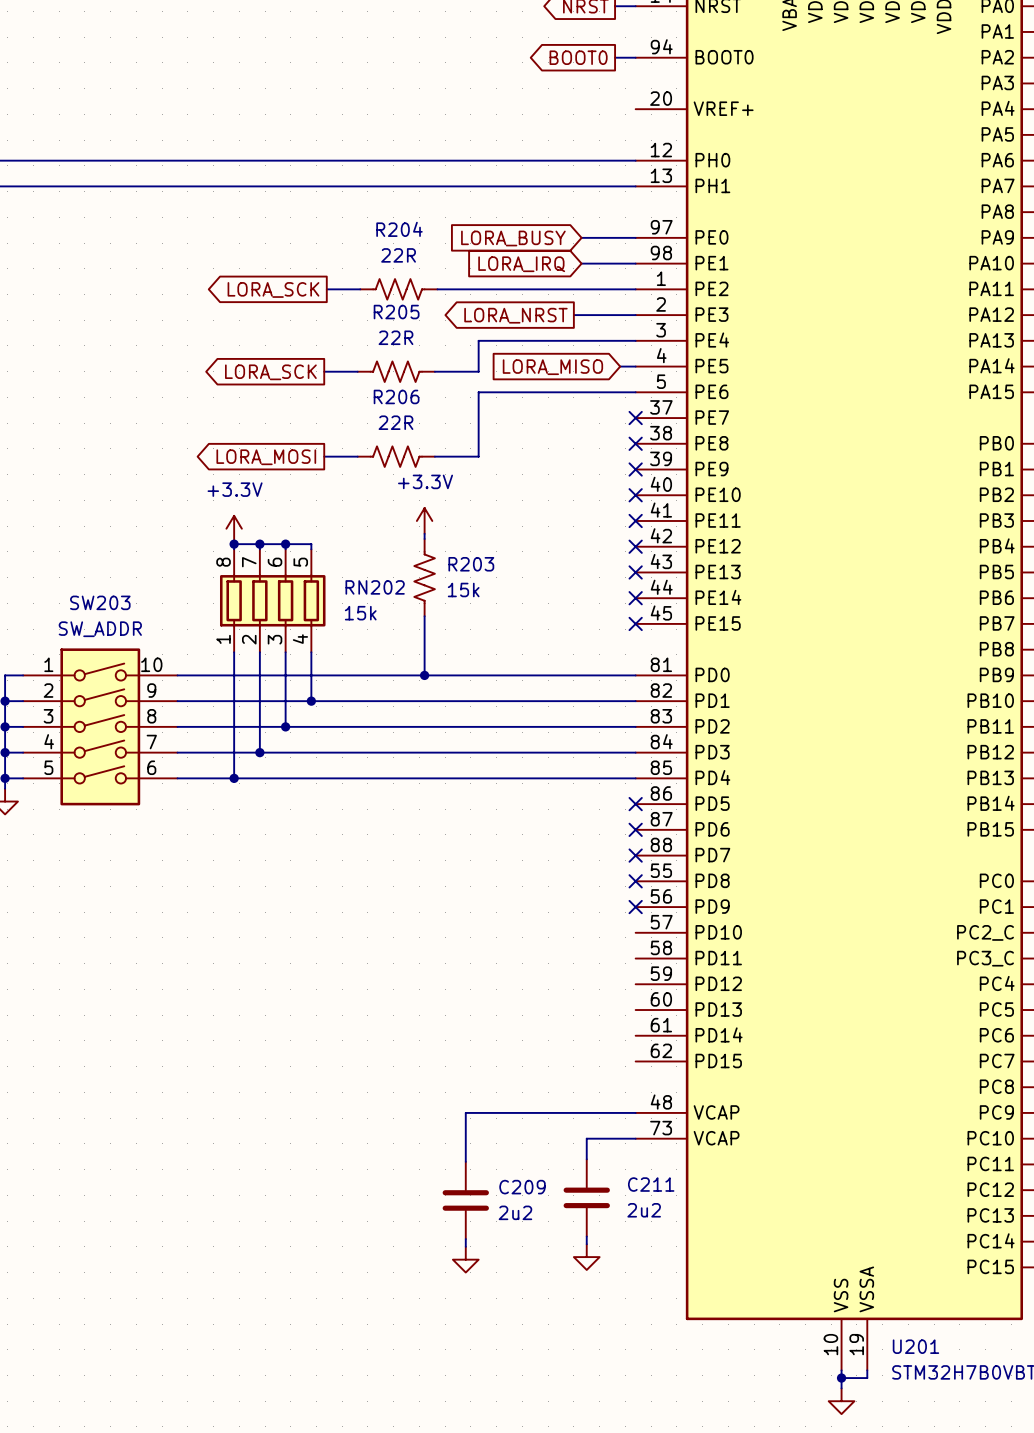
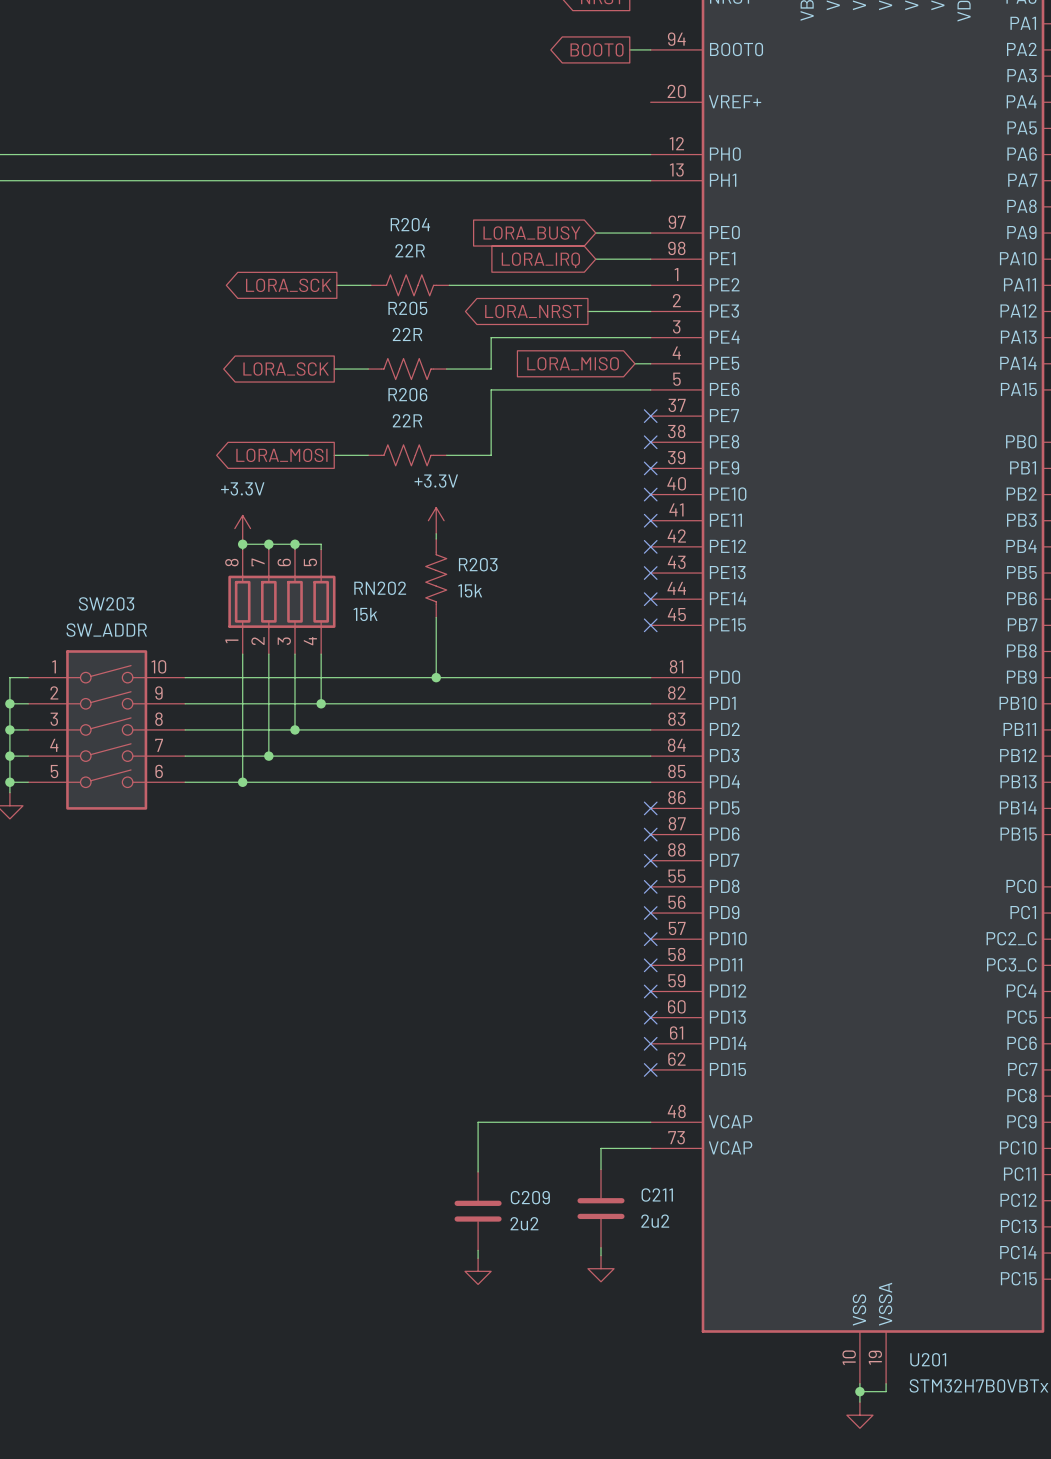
no-connect mark: none -> (650, 939)
no-connect mark: none -> (650, 965)
no-connect mark: none -> (650, 991)
no-connect mark: none -> (650, 1017)
no-connect mark: none -> (650, 1043)
no-connect mark: none -> (650, 1069)

